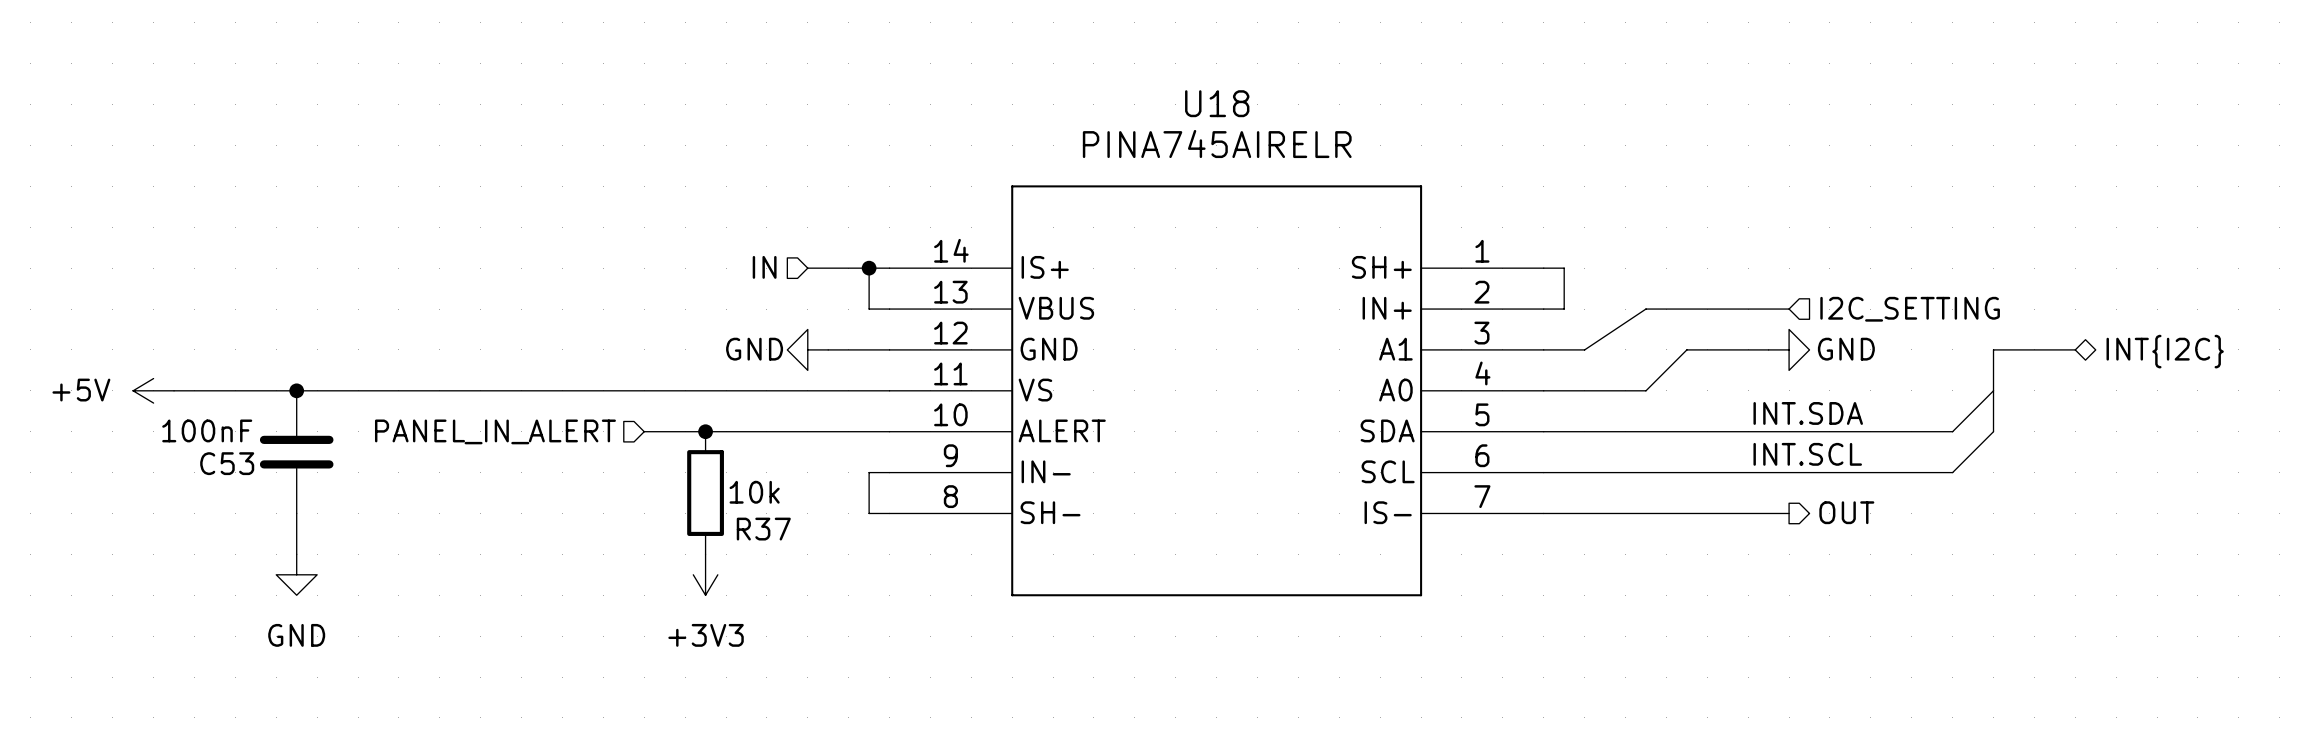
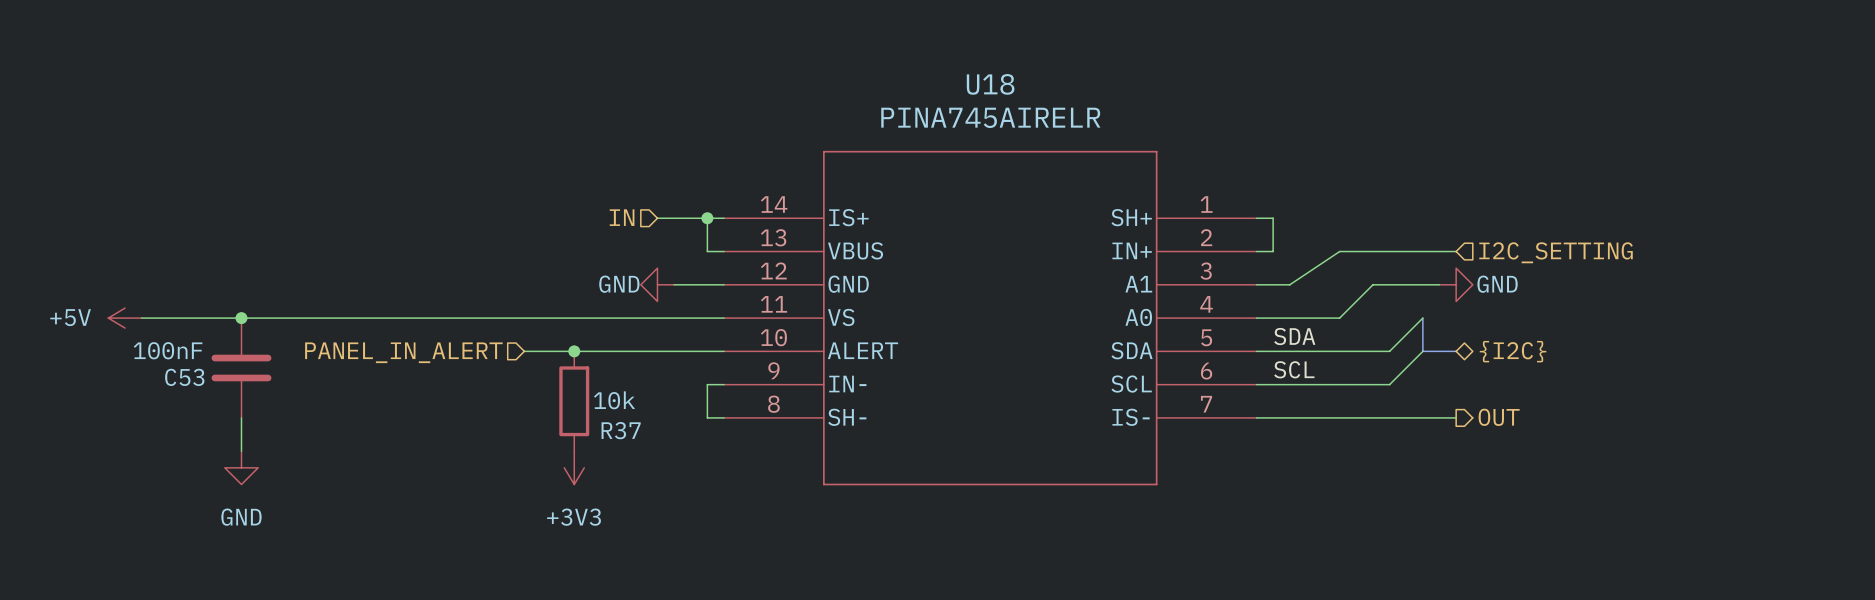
bus: (2075, 349) (1993, 349) (1993, 431) -> none
hierarchical label: INT{I2C} (2165, 351) -> none
bus: none -> (1422, 318) (1422, 351) (1456, 351)
wire: (1993, 390) (1952, 431) (1707, 431) -> (1422, 318) (1389, 351)
label: none -> SDA (1294, 336)
label: INT.SDA (1808, 413) -> none
wire: (1993, 431) (1952, 472) (1707, 472) -> (1422, 351) (1389, 384)
hierarchical label: none -> {I2C} (1513, 351)
label: none -> SCL (1294, 369)
label: INT.SCL (1807, 454) -> none

